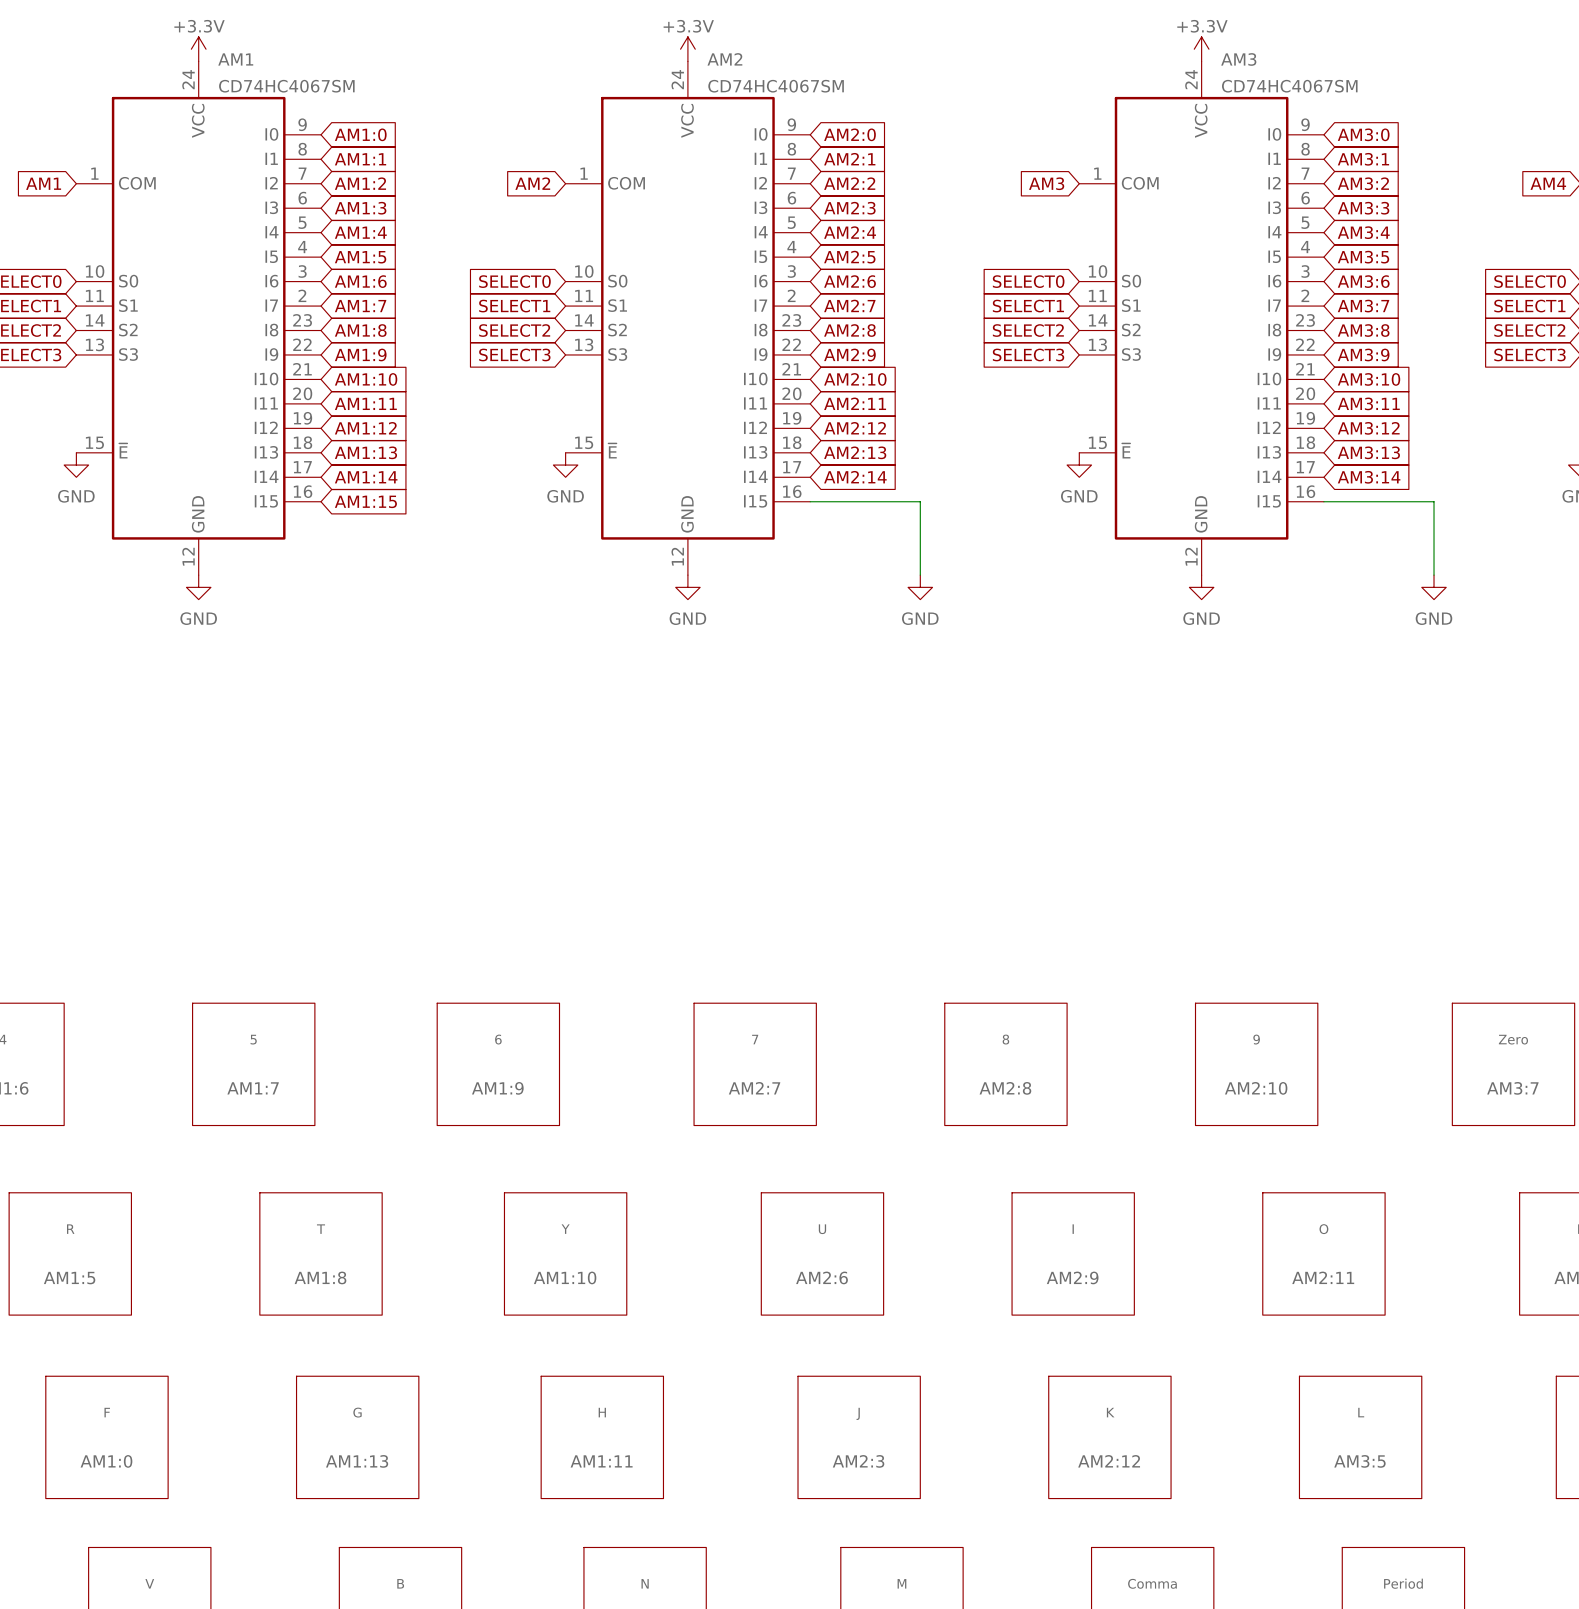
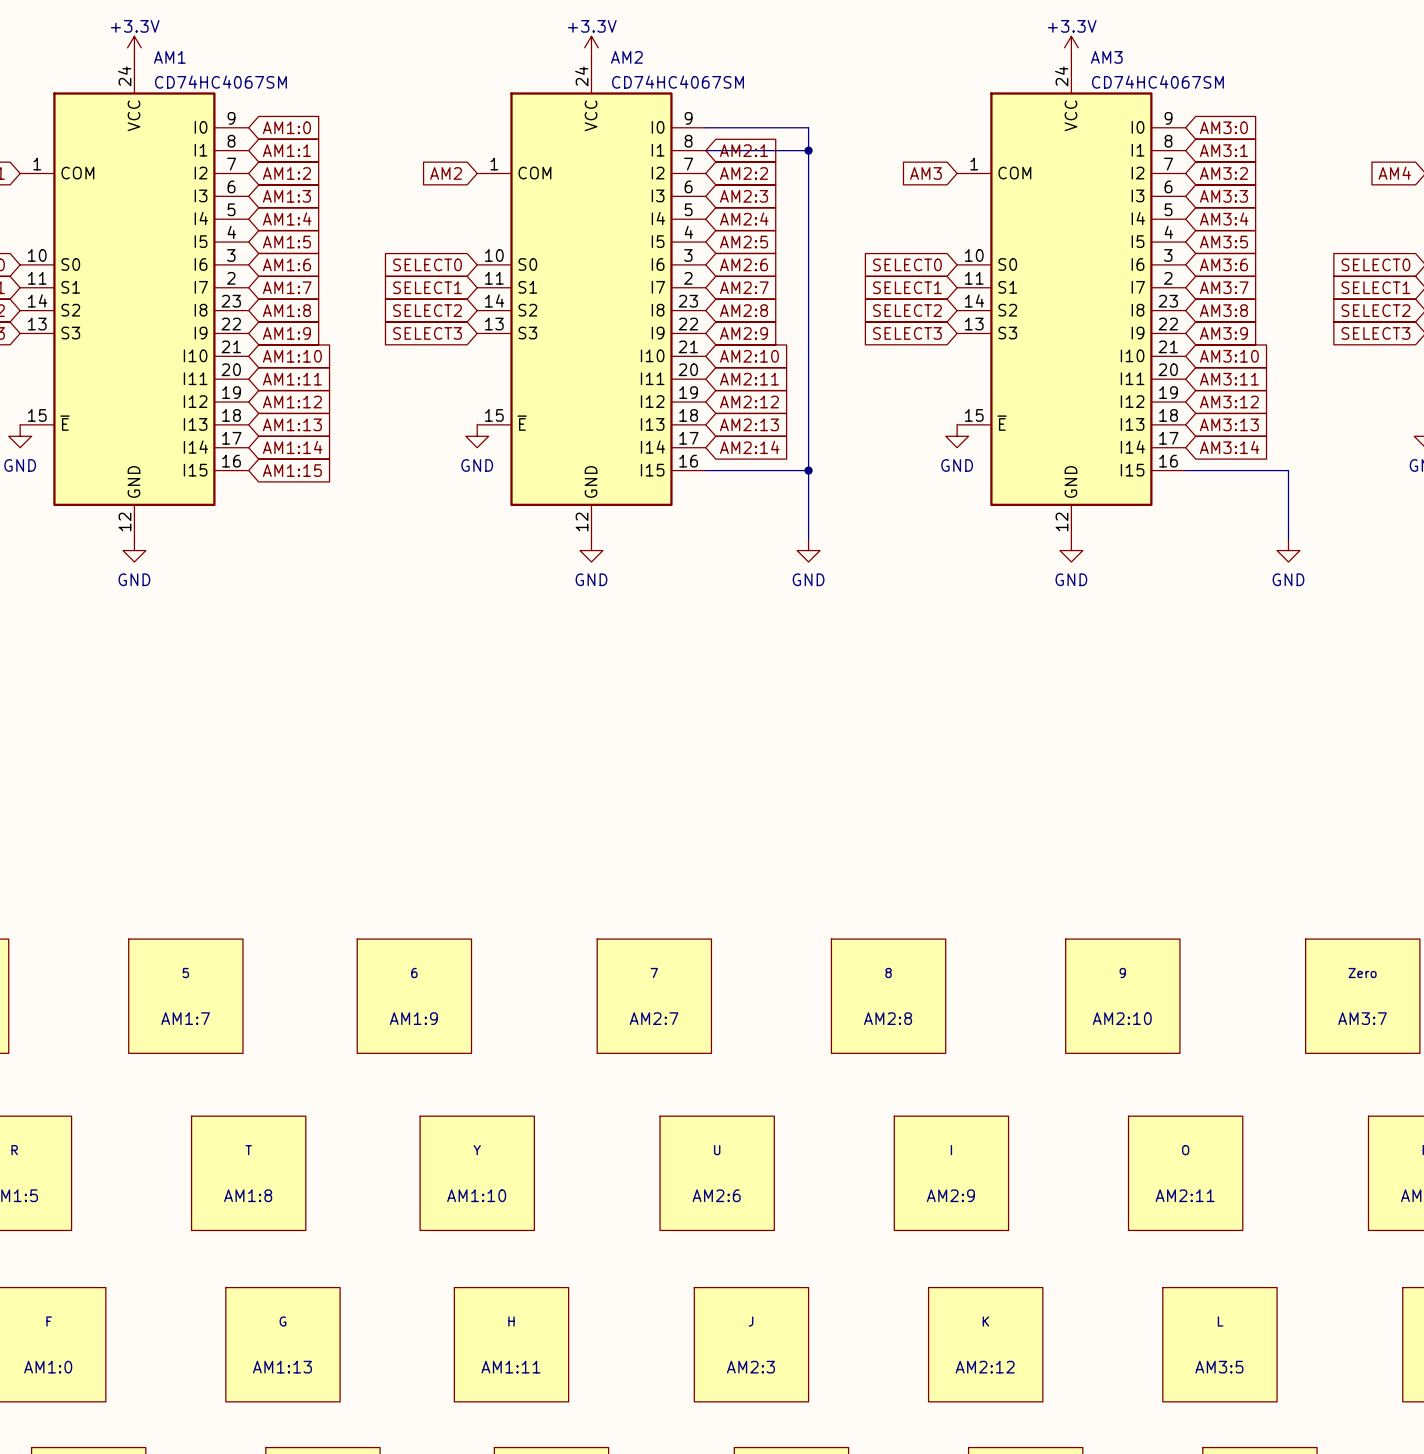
wire: none -> (705, 127) (808, 127) (808, 470)
global label: AM2:0 (849, 134) -> none
wire: none -> (705, 150) (808, 150)
junction: none -> (808, 150)
junction: none -> (808, 470)

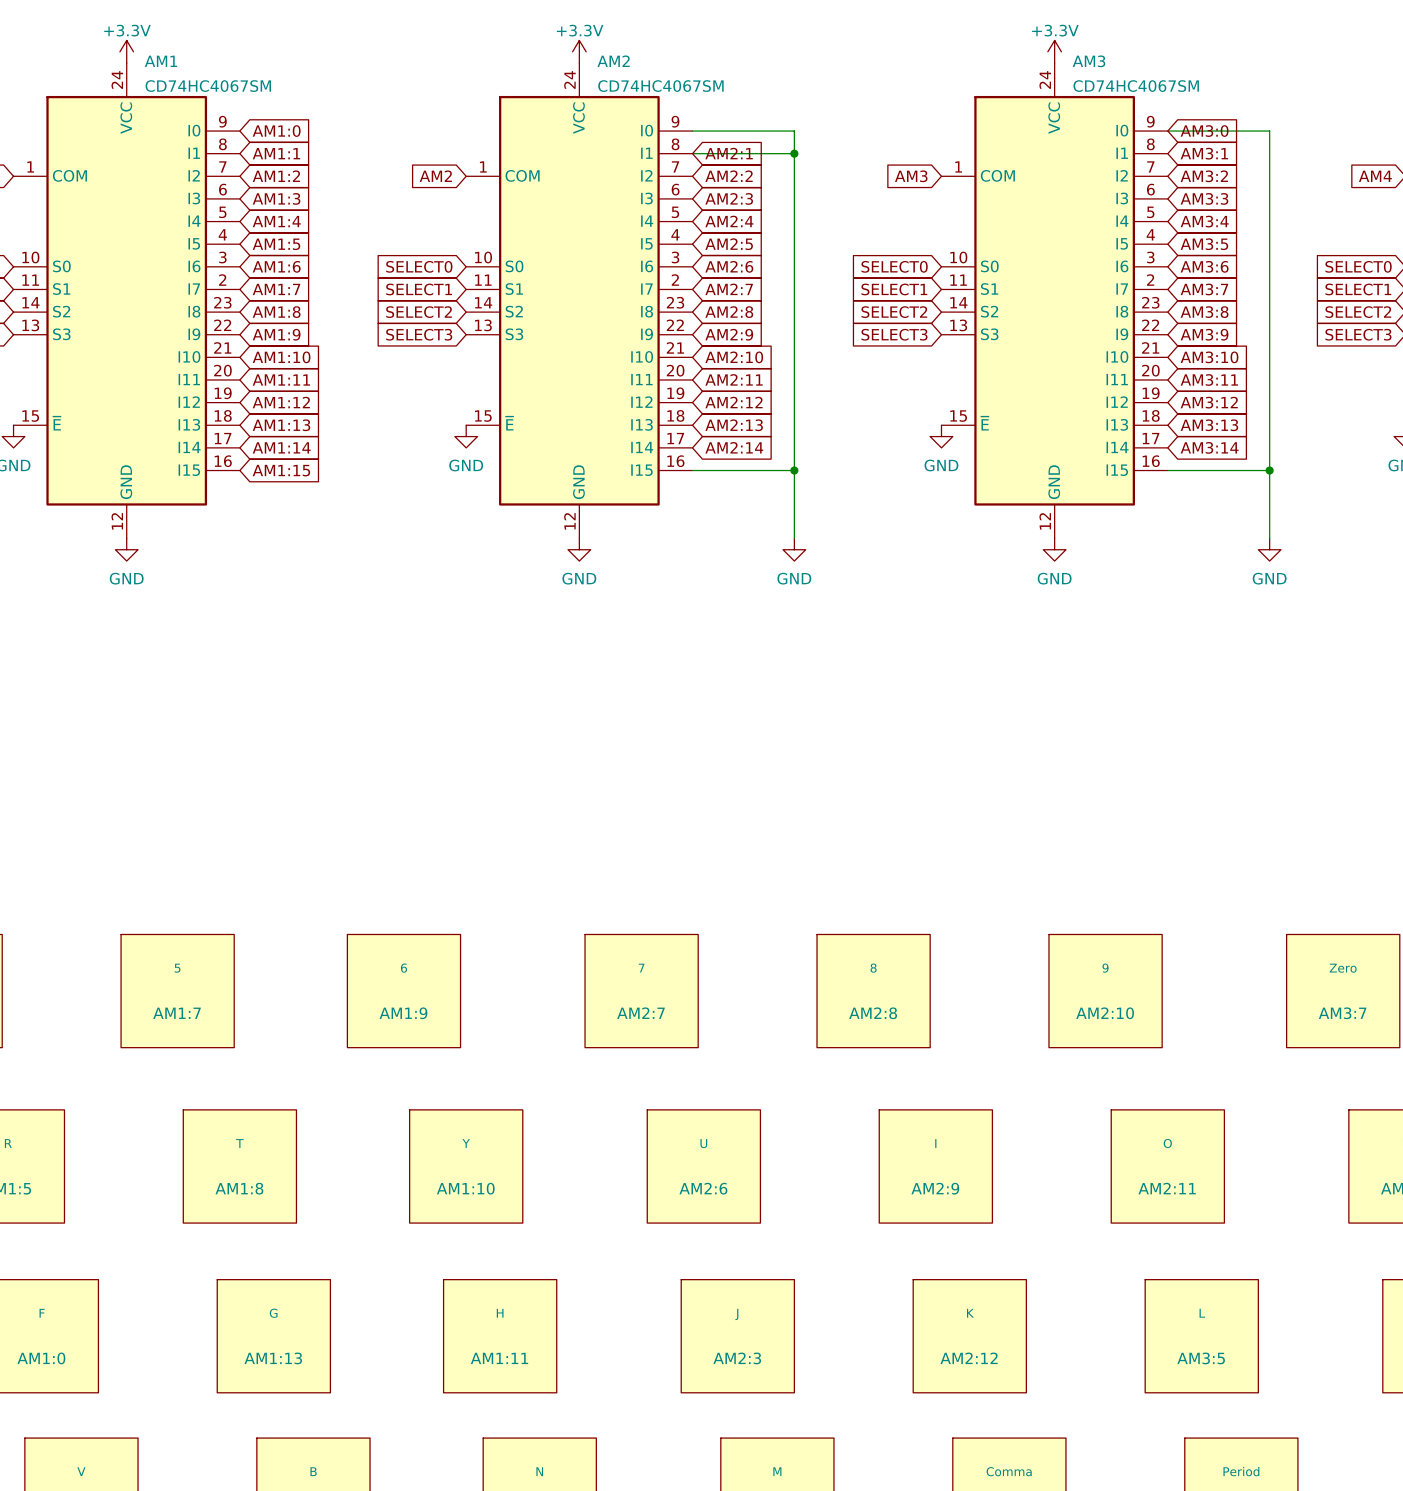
wire: none -> (1167, 131) (1269, 131) (1269, 470)
junction: none -> (1269, 470)

